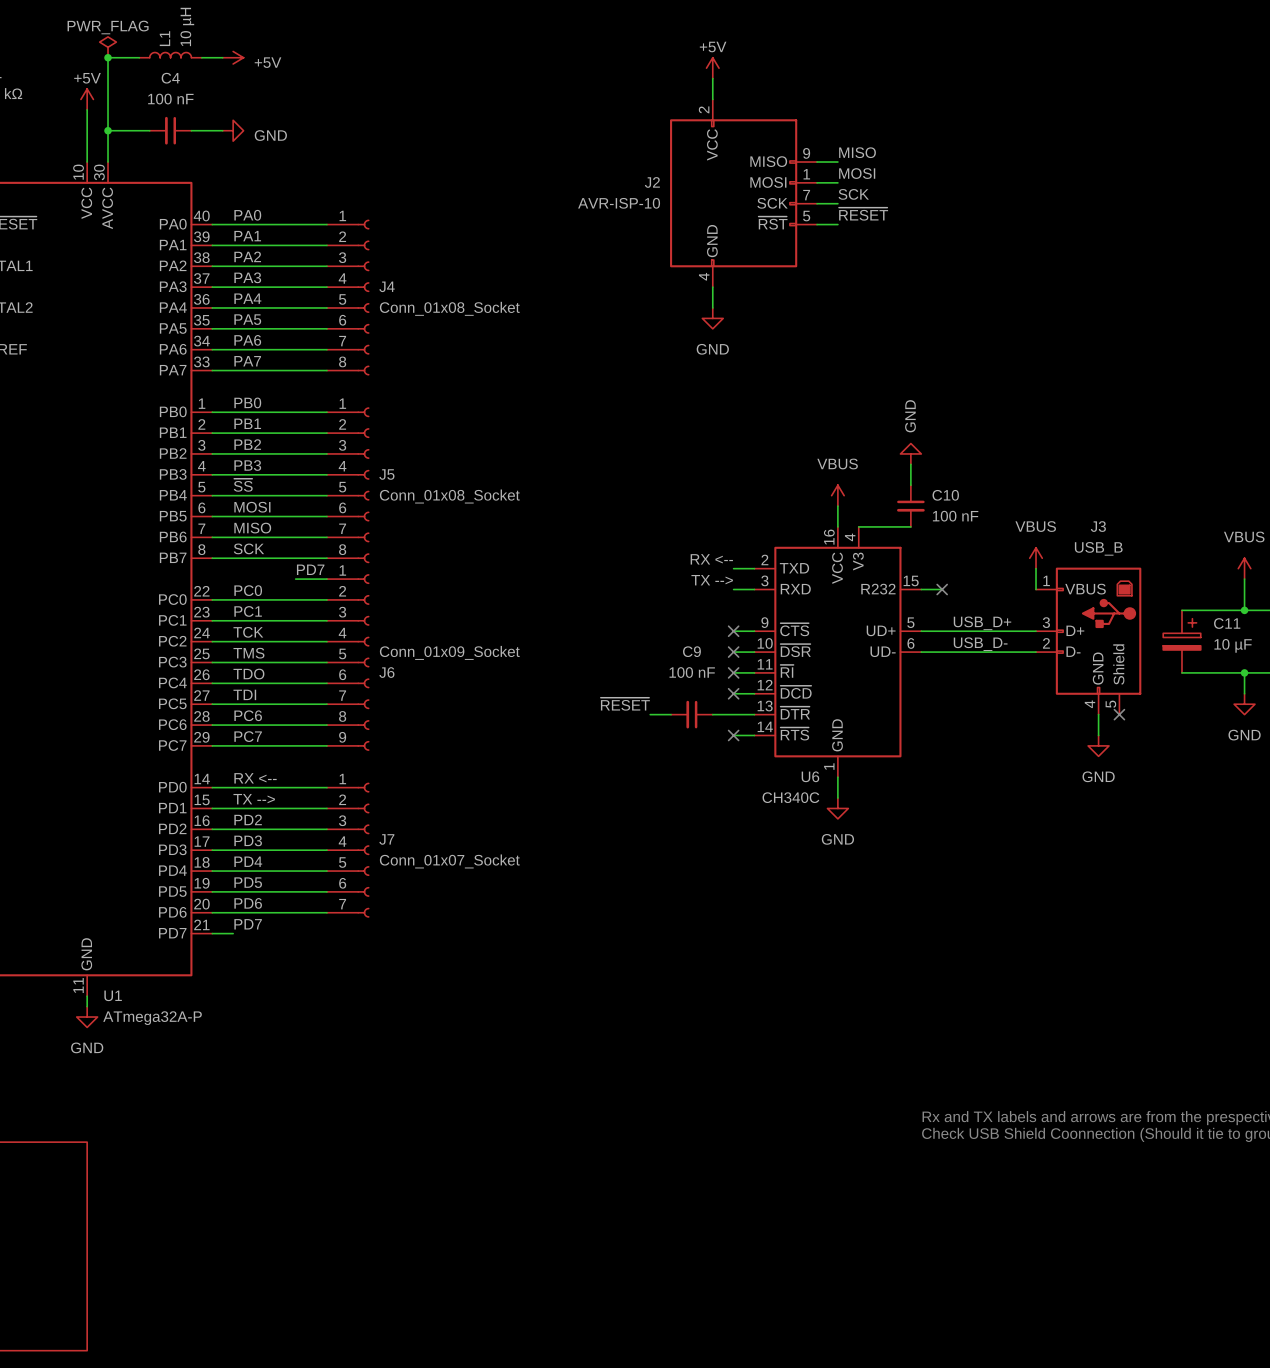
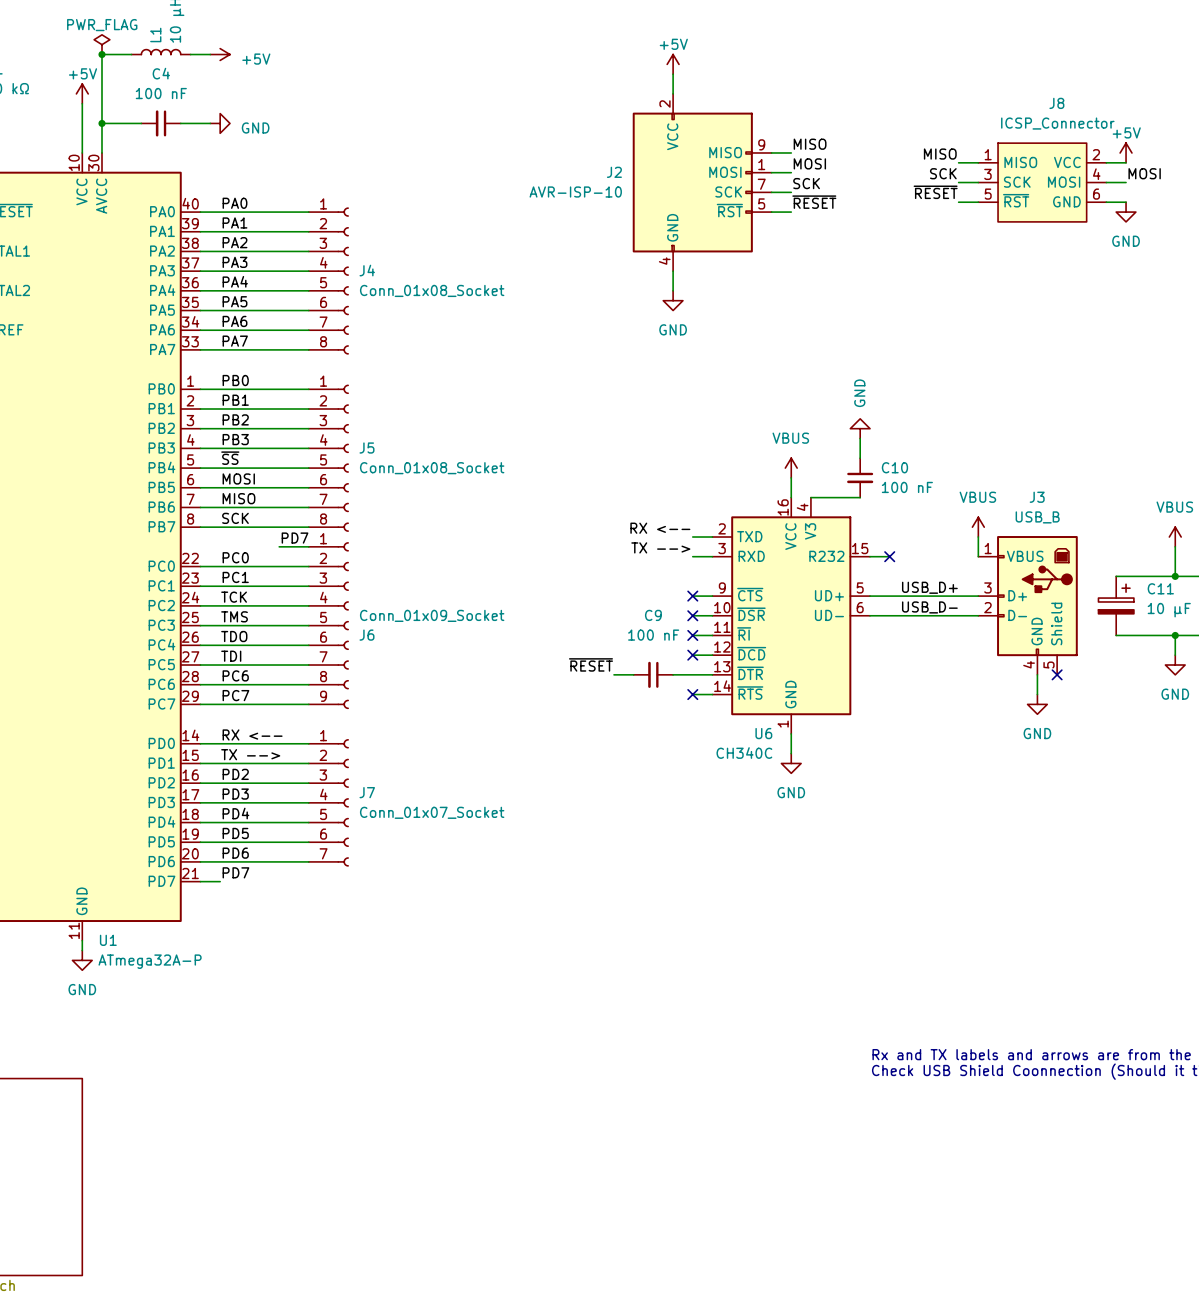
power symbol: none -> +5V (1126, 152)
label: none -> MISO (940, 154)
wire: none -> (958, 162) (978, 162)
wire: none -> (1106, 162) (1126, 162)
label: none -> SCK (943, 173)
label: none -> MOSI (1144, 173)
wire: none -> (958, 182) (978, 182)
J8: none -> ICSP_Connector (1047, 182)
wire: none -> (1106, 182) (1126, 182)
label: none -> ~{RESET} (935, 192)
wire: none -> (958, 202) (978, 202)
wire: none -> (1106, 202) (1126, 202)
power symbol: none -> GND (1126, 212)

